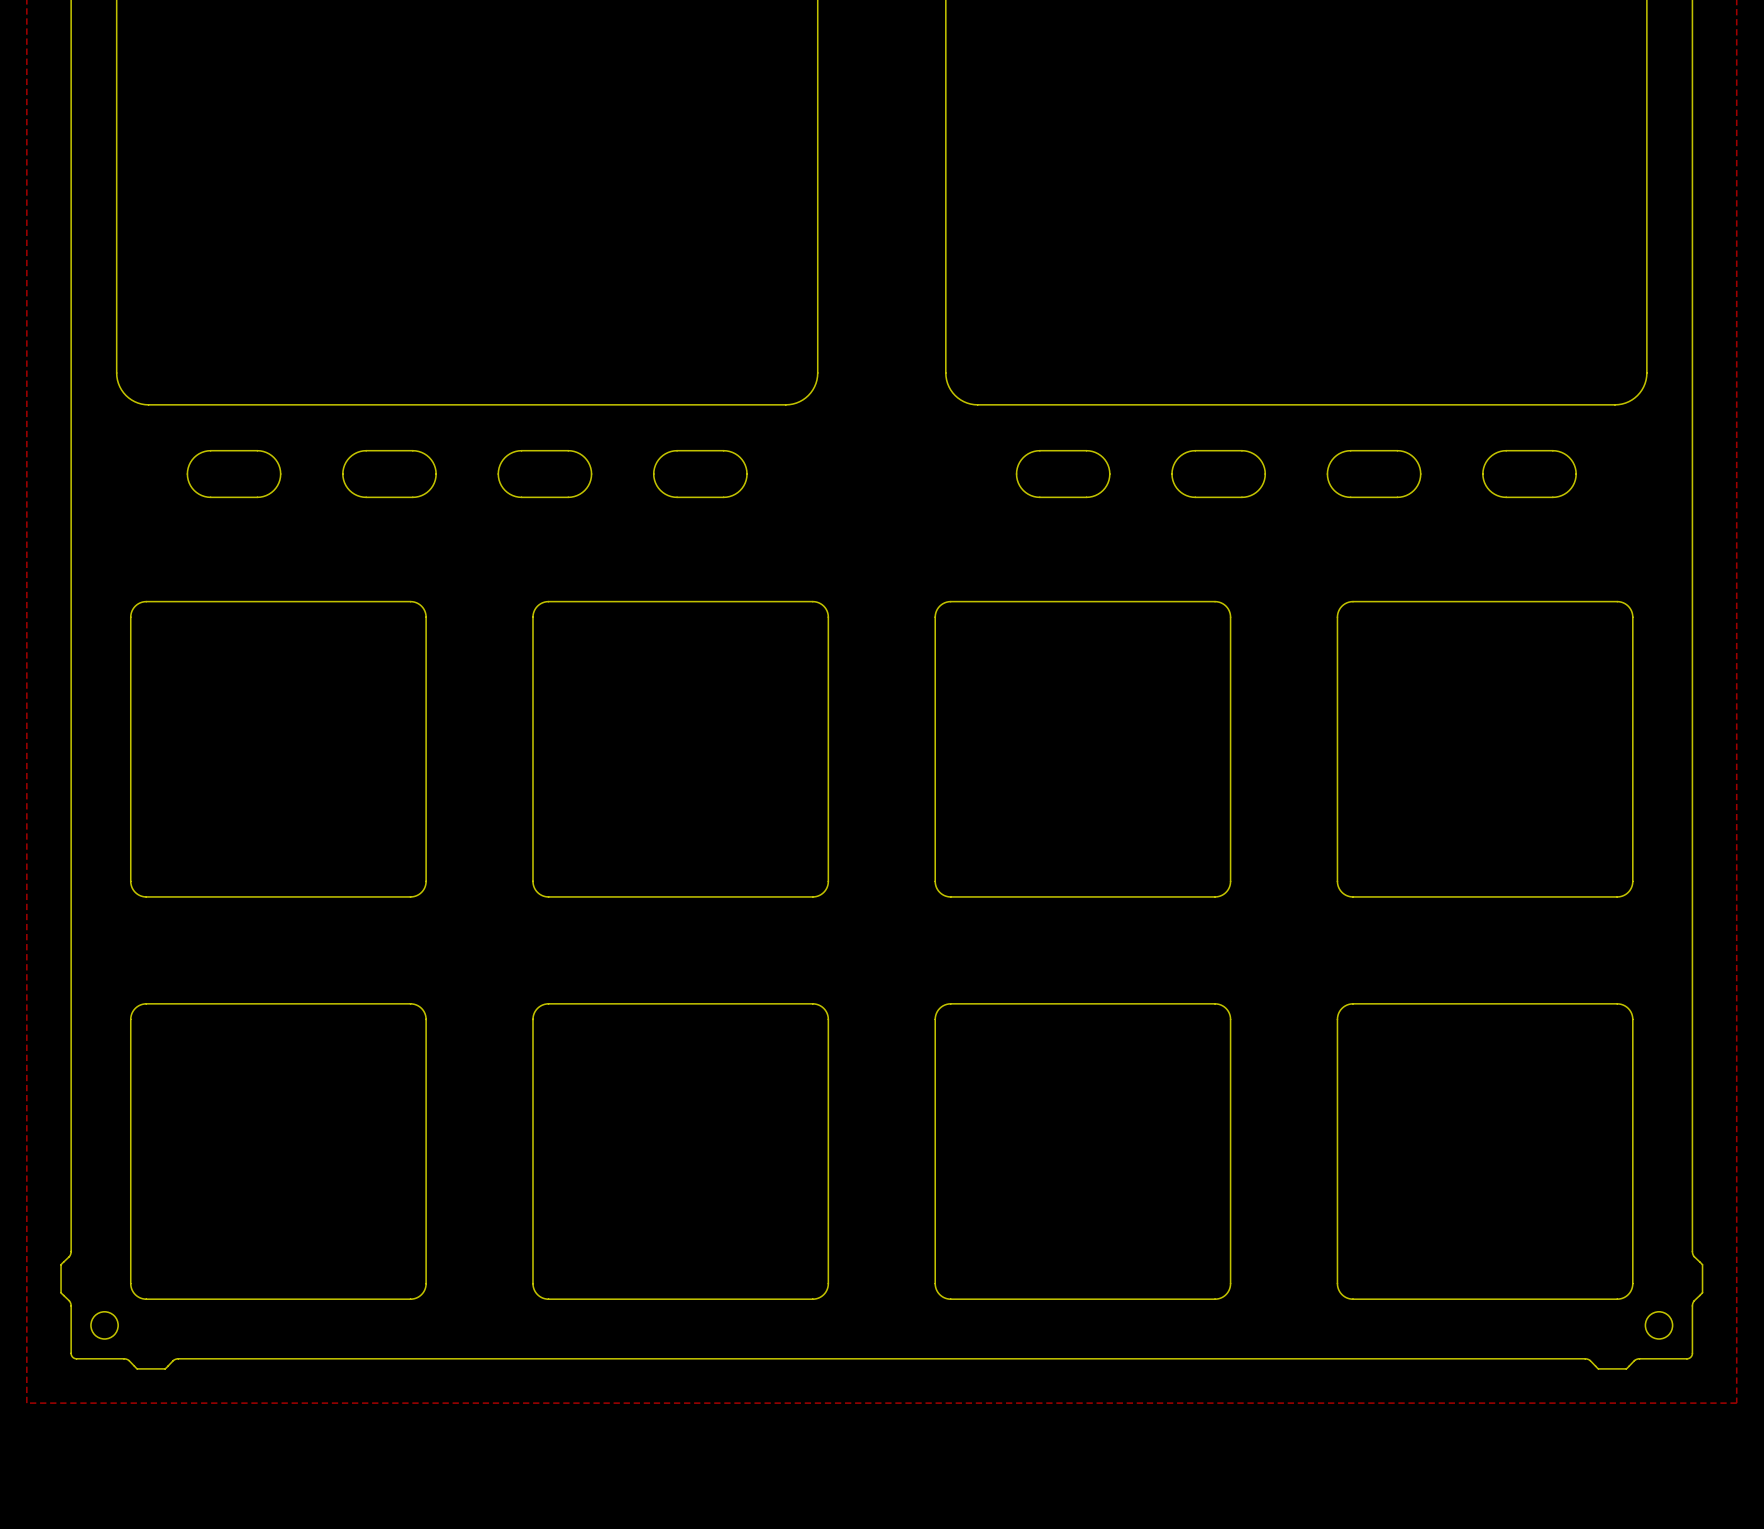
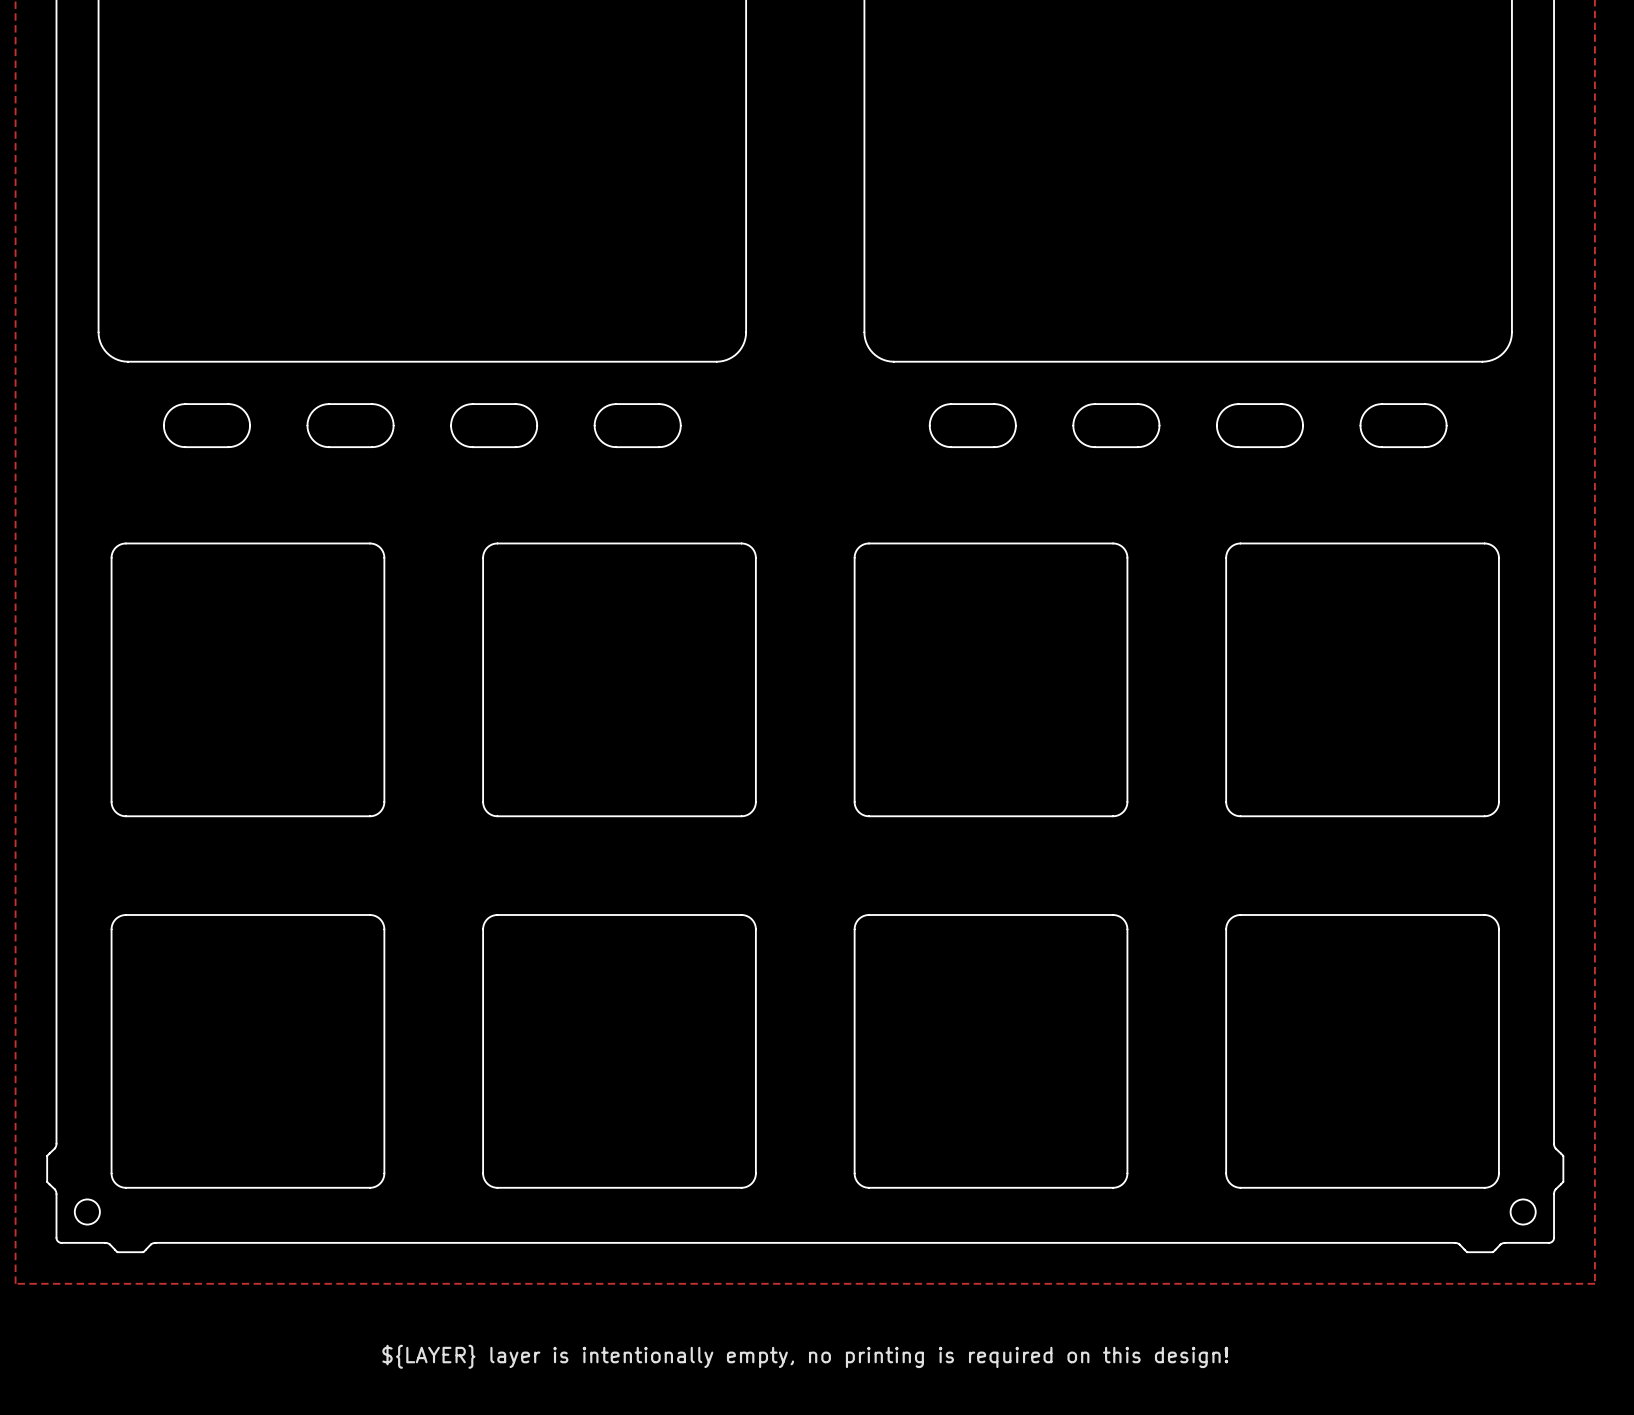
text: none -> ${LAYER} layer is intentionally empty, no printing is required on this design! (805, 1356)

